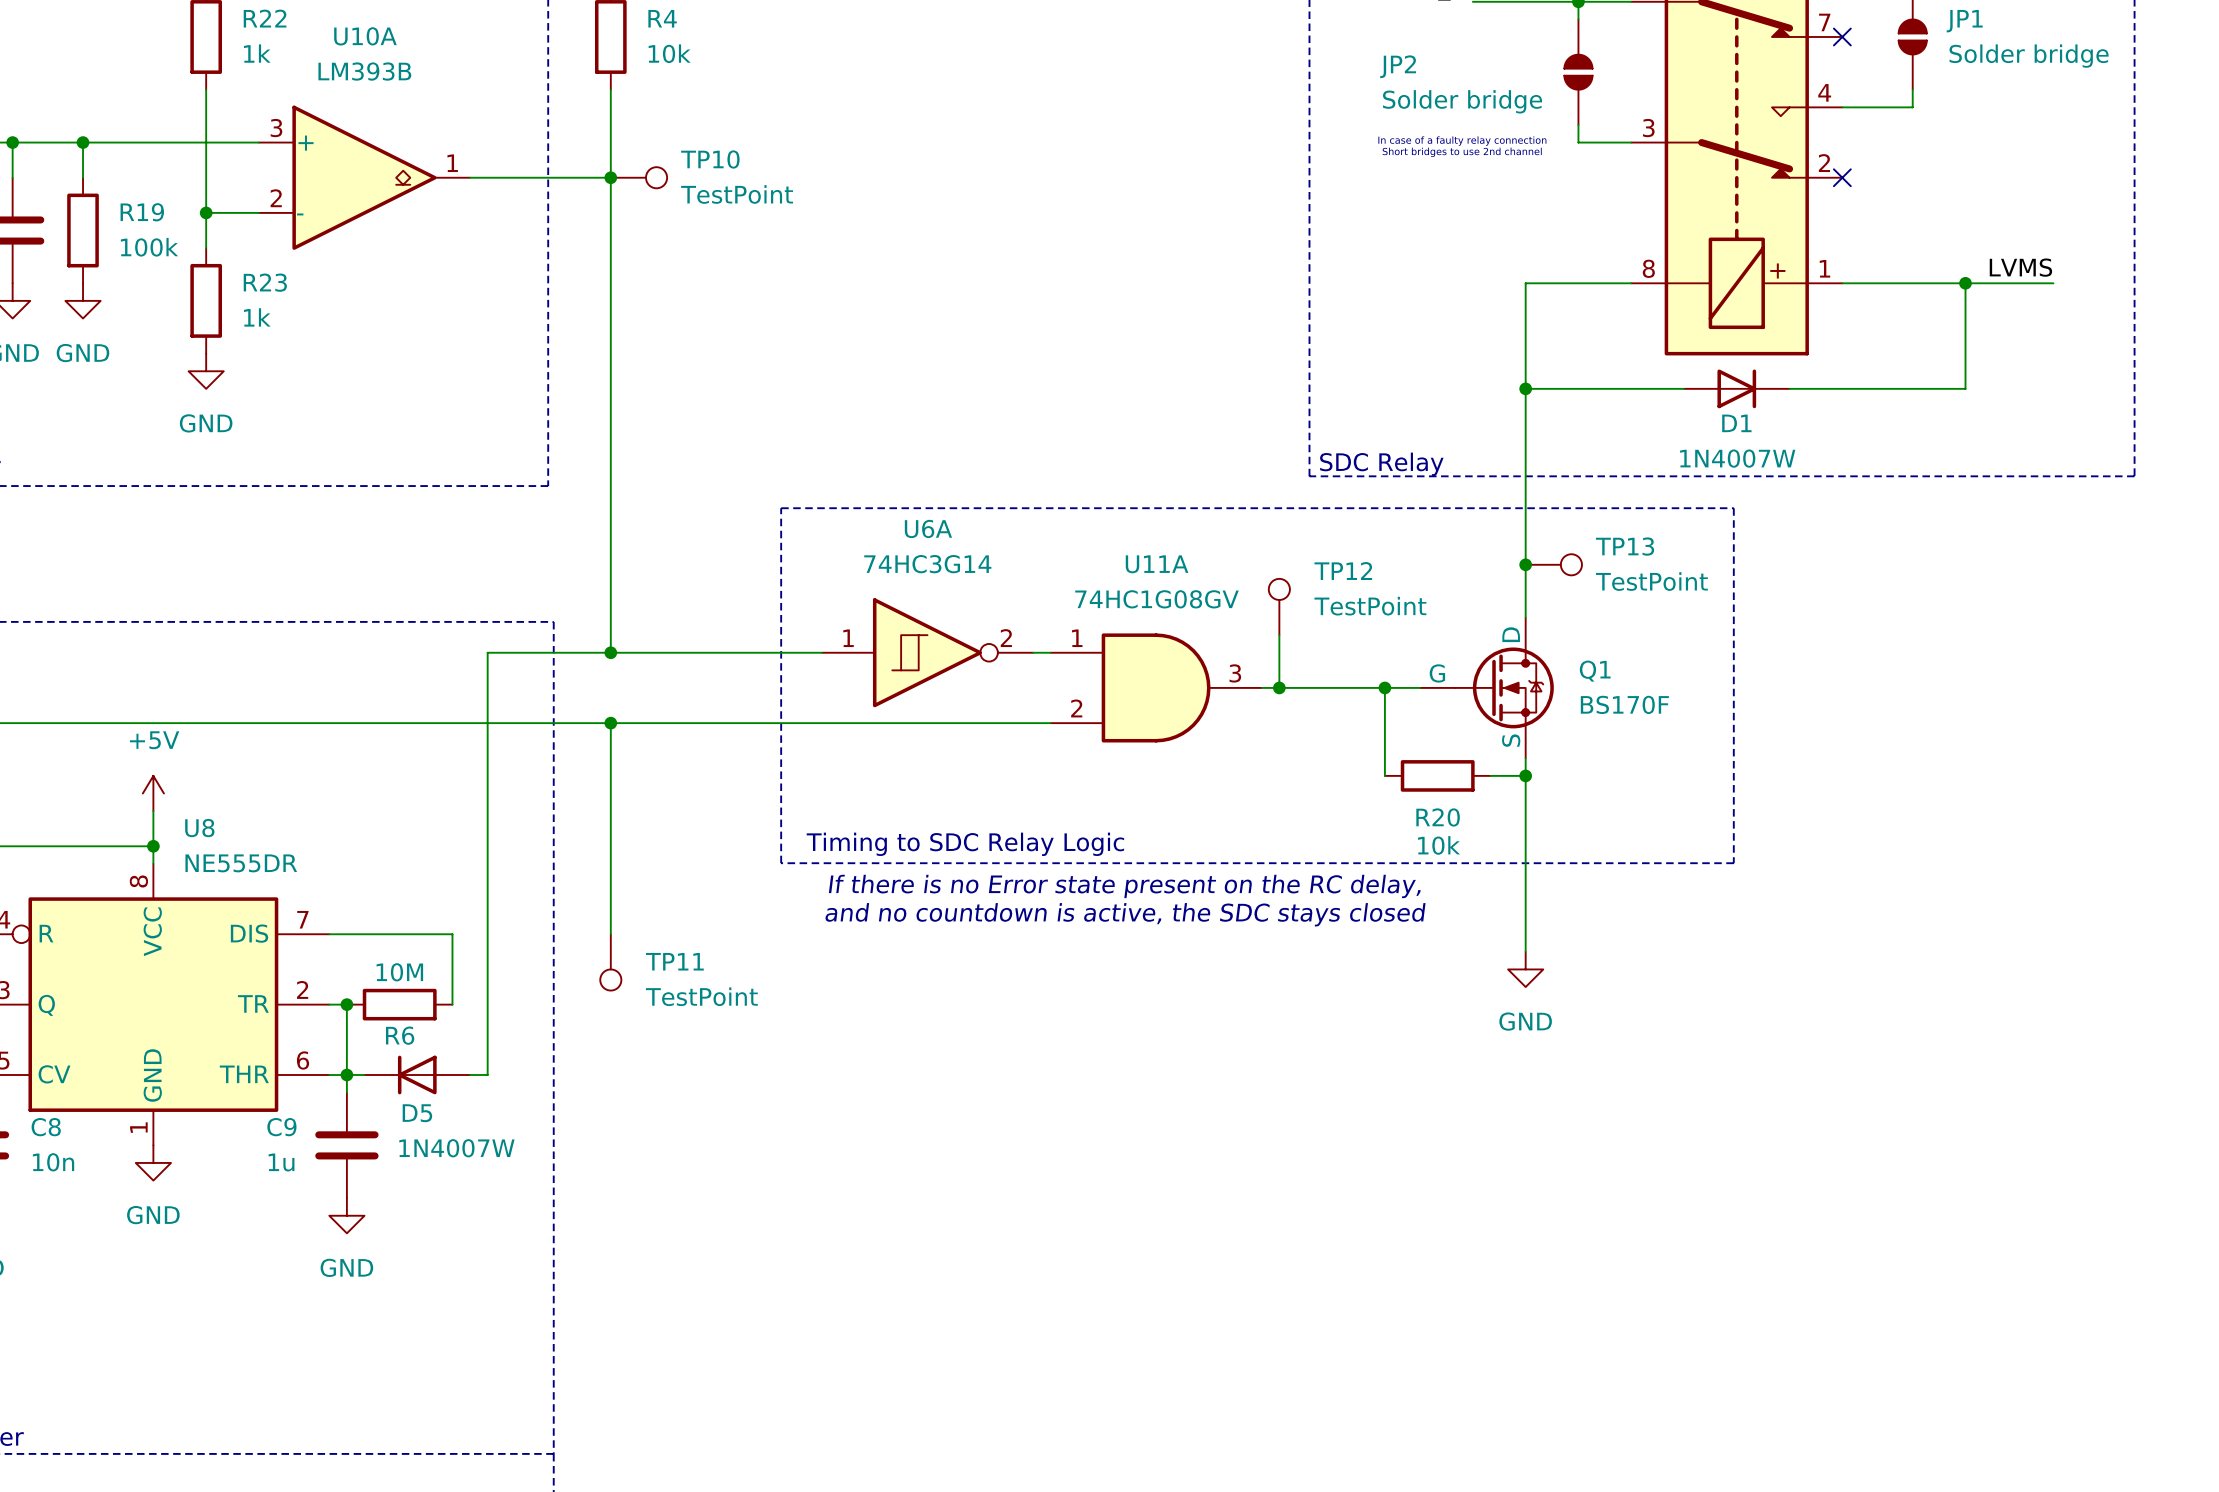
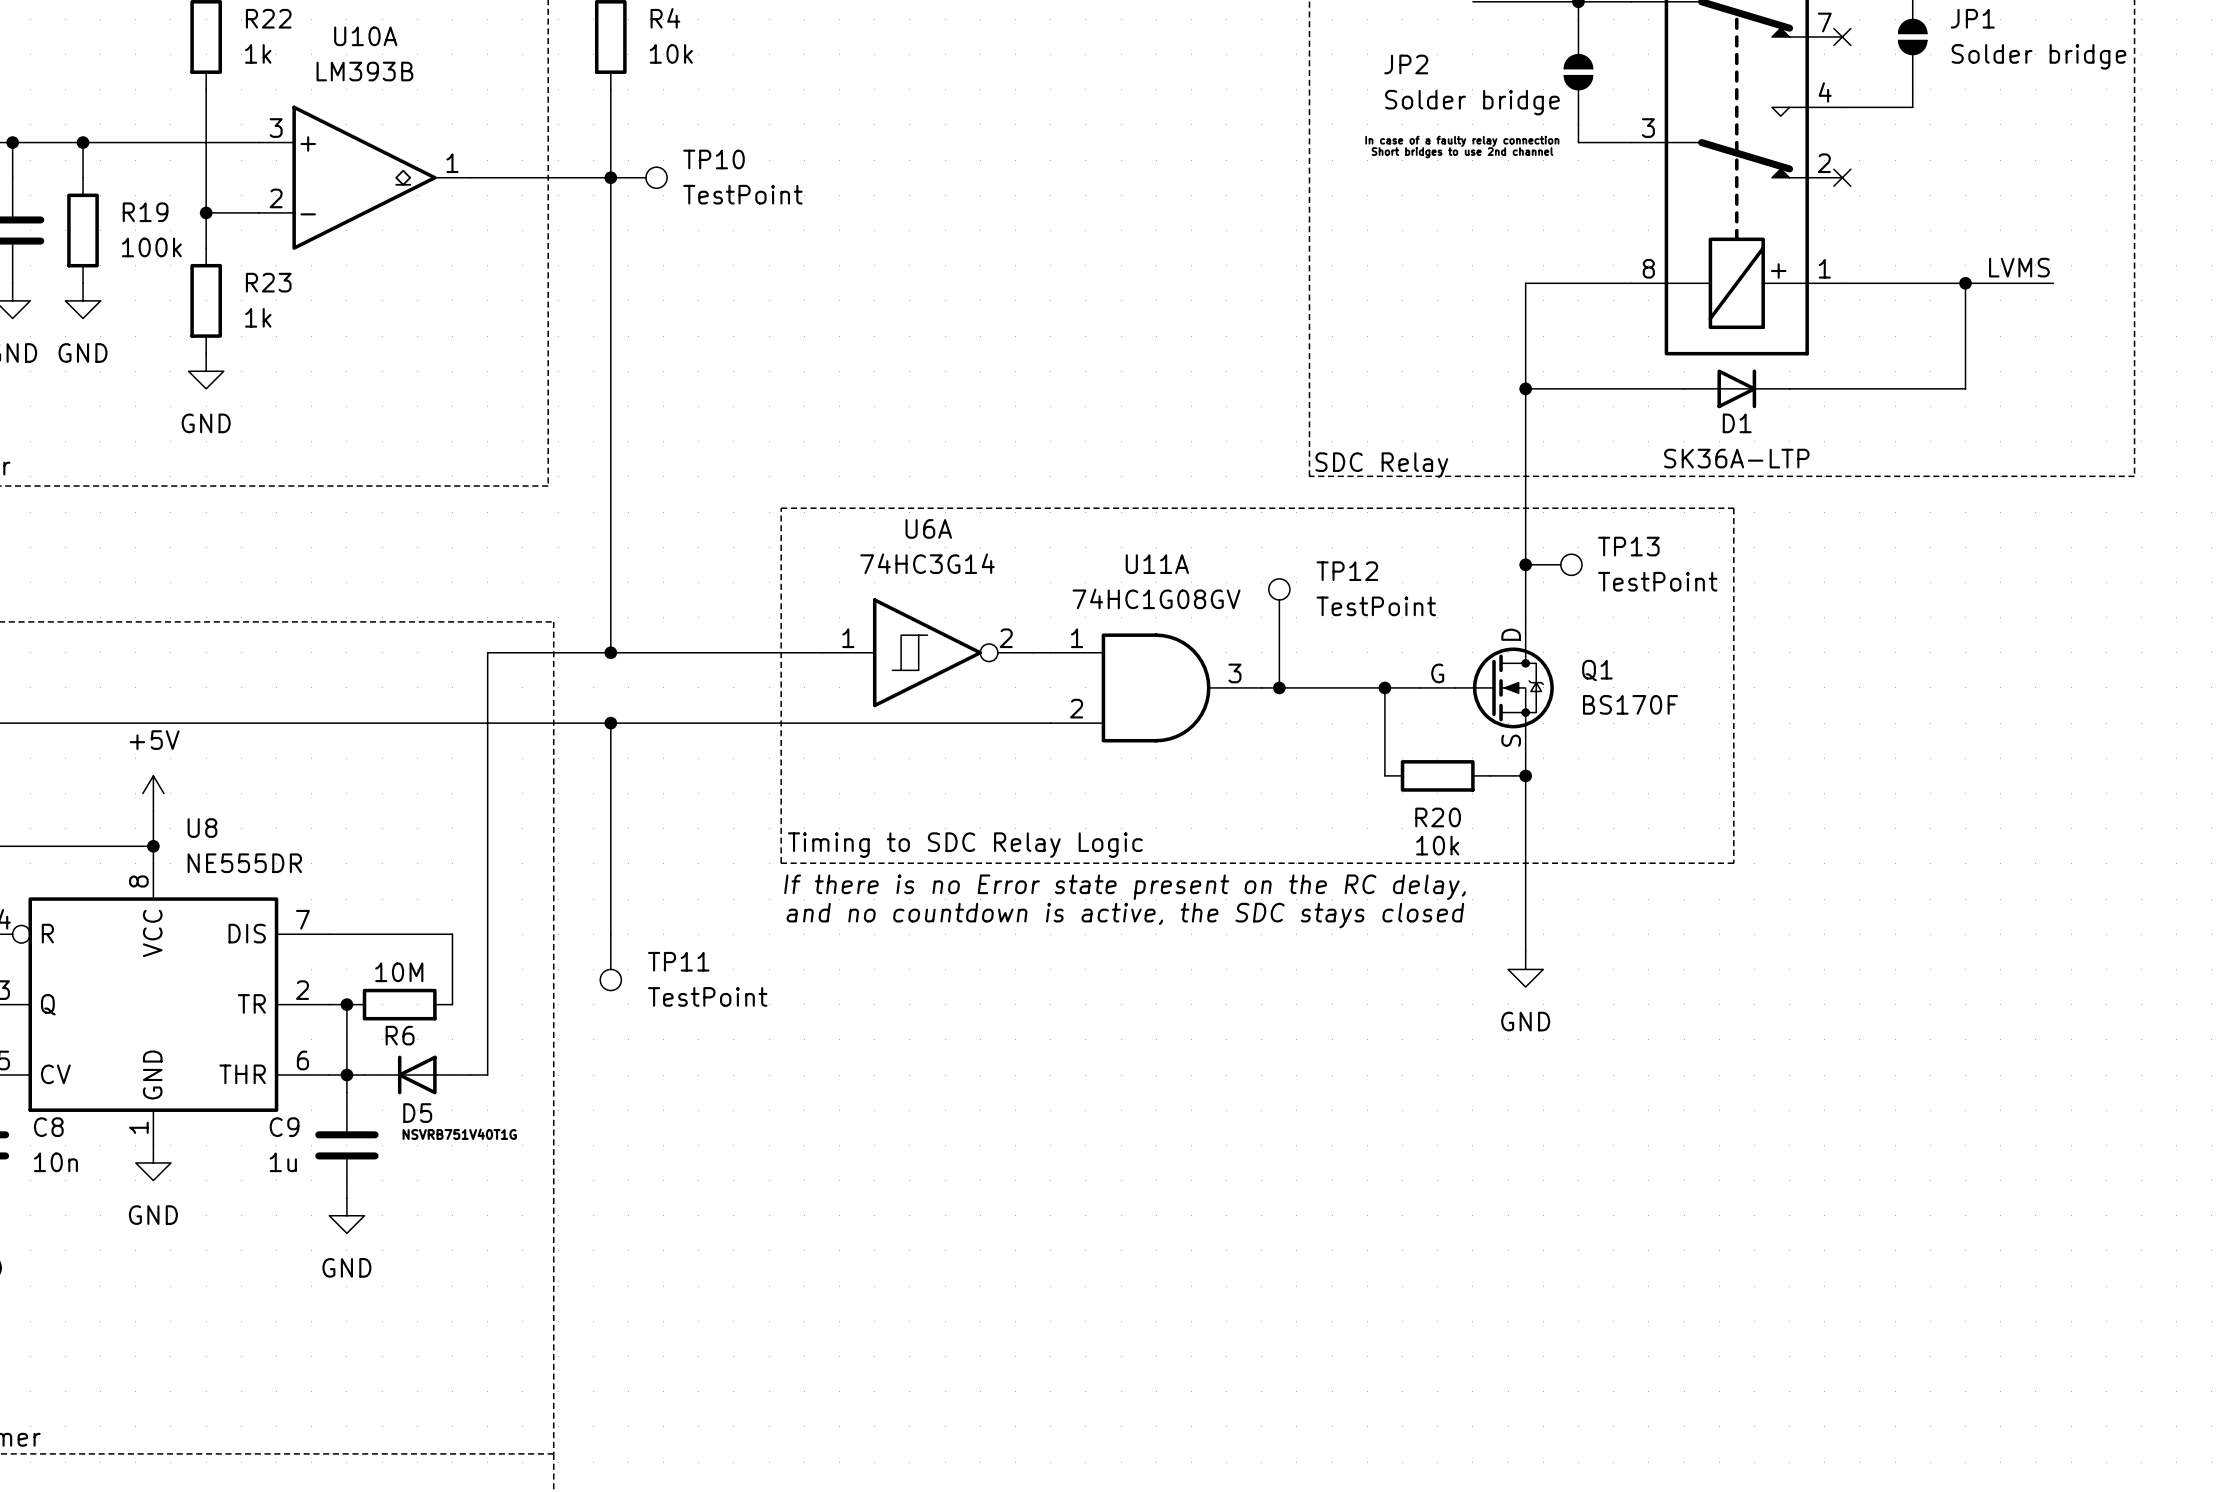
D1 value: 1N4007W (1737, 458) -> SK36A-LTP (1736, 458)
D5 value: 1N4007W (456, 1148) -> NSVRB751V40T1G (459, 1134)

